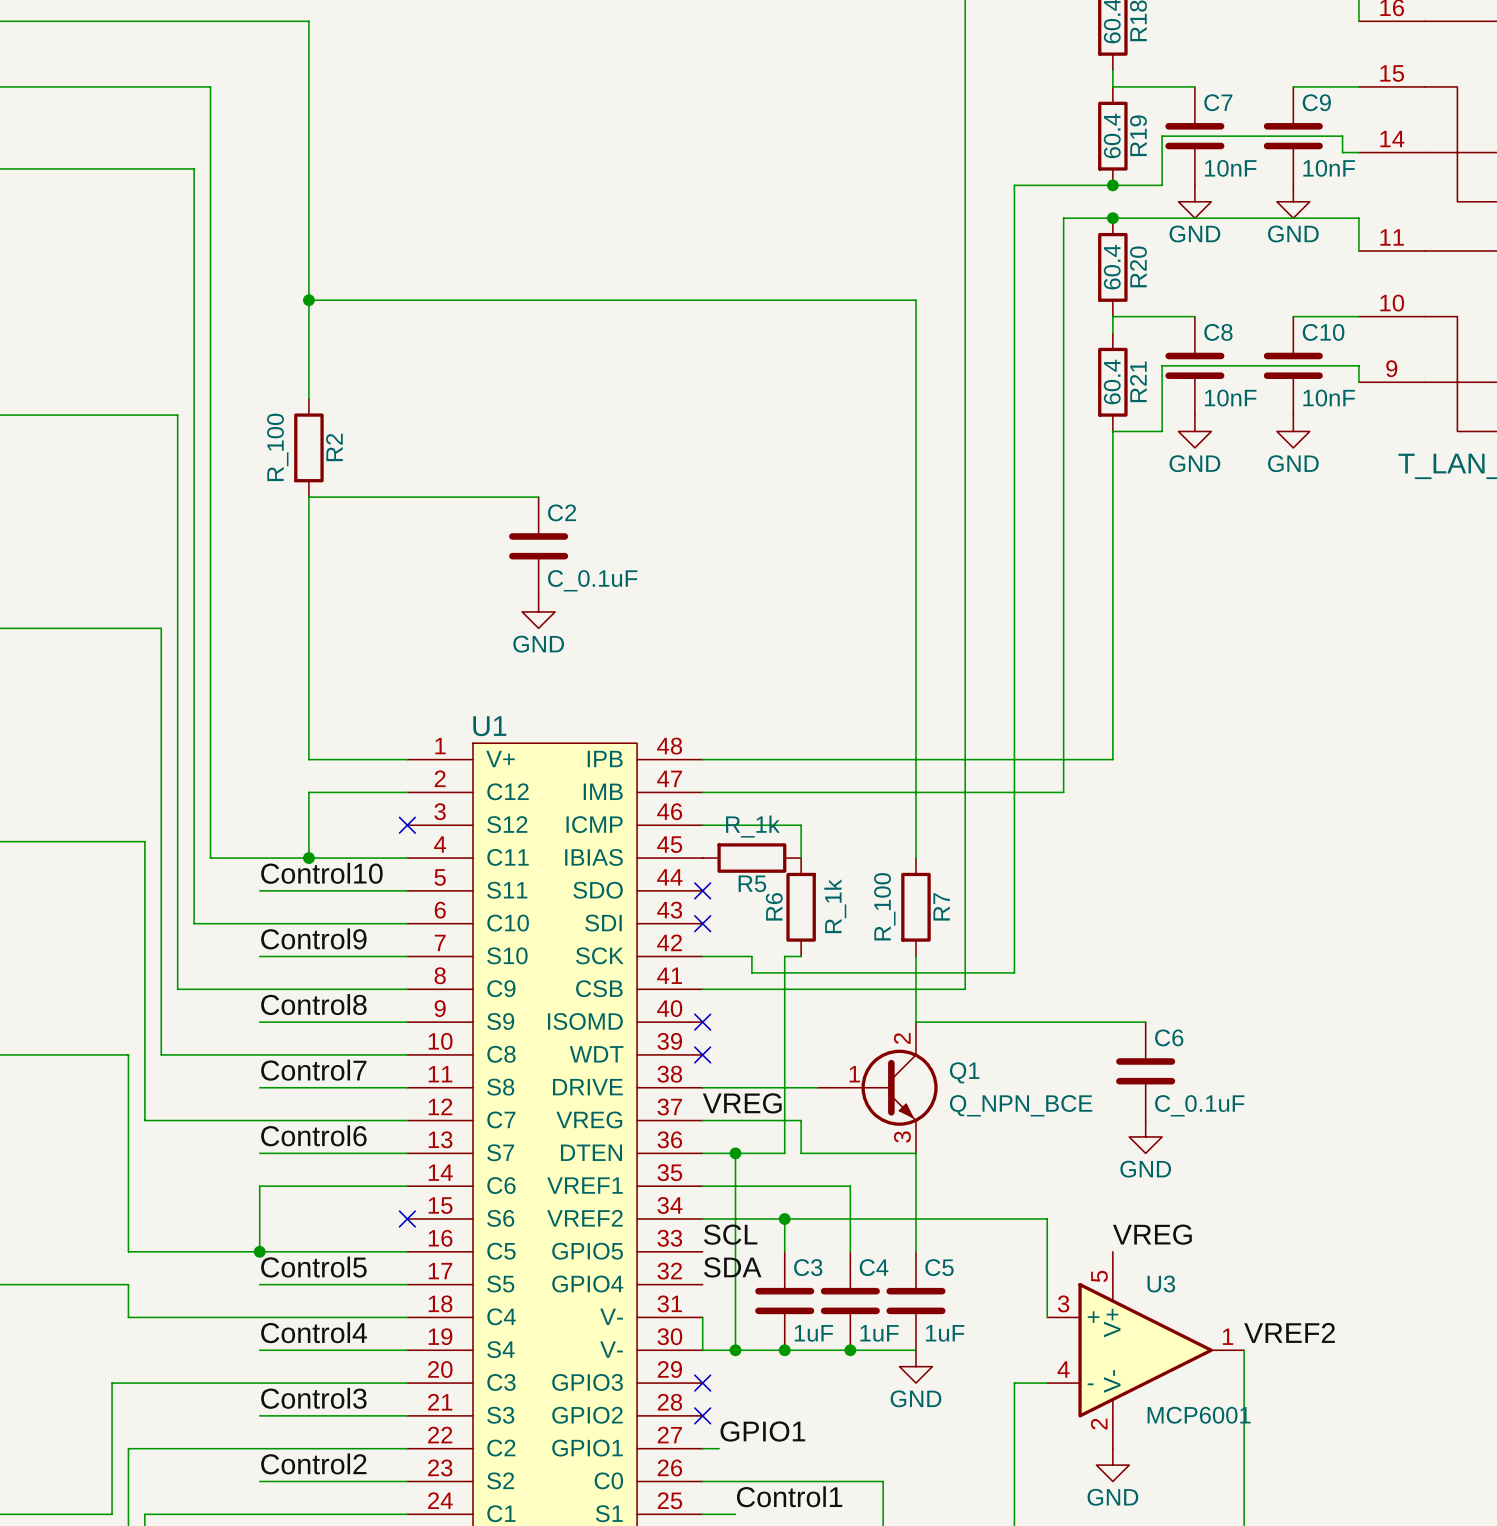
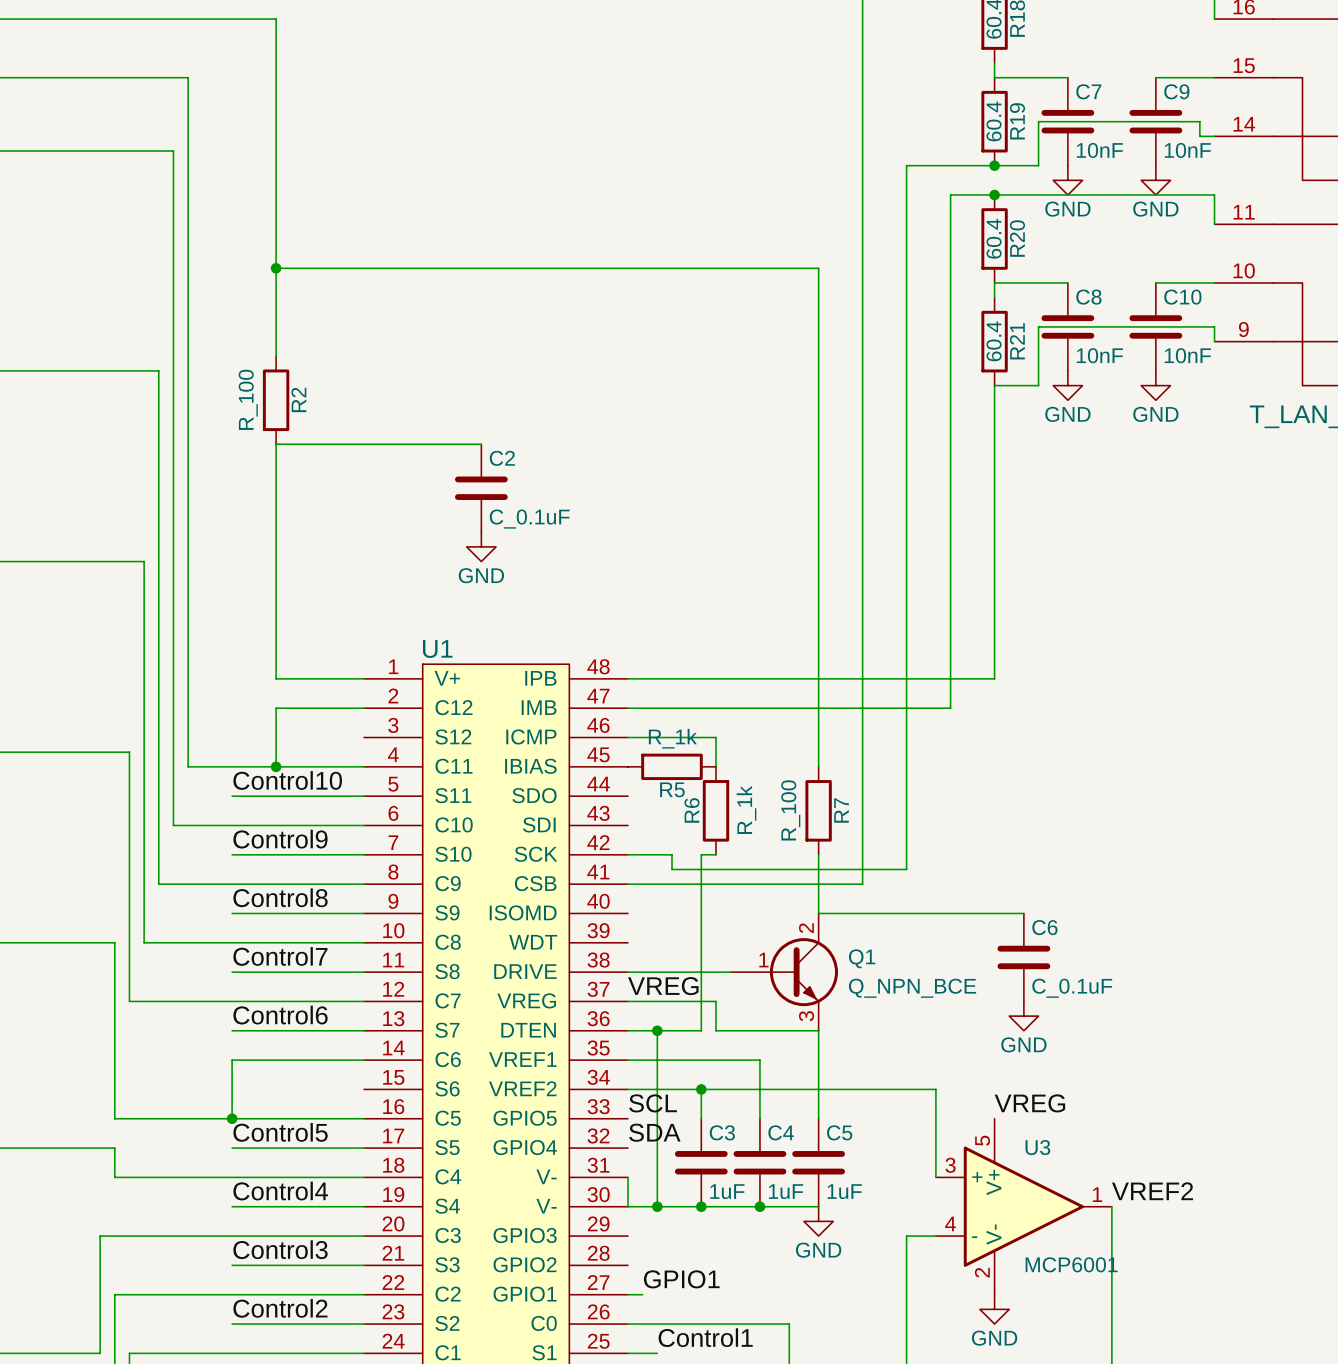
no-connect mark: (407, 825) -> none
no-connect mark: (702, 890) -> none
no-connect mark: (702, 923) -> none
no-connect mark: (702, 1022) -> none
no-connect mark: (702, 1054) -> none
no-connect mark: (407, 1219) -> none
no-connect mark: (702, 1383) -> none
no-connect mark: (702, 1415) -> none

